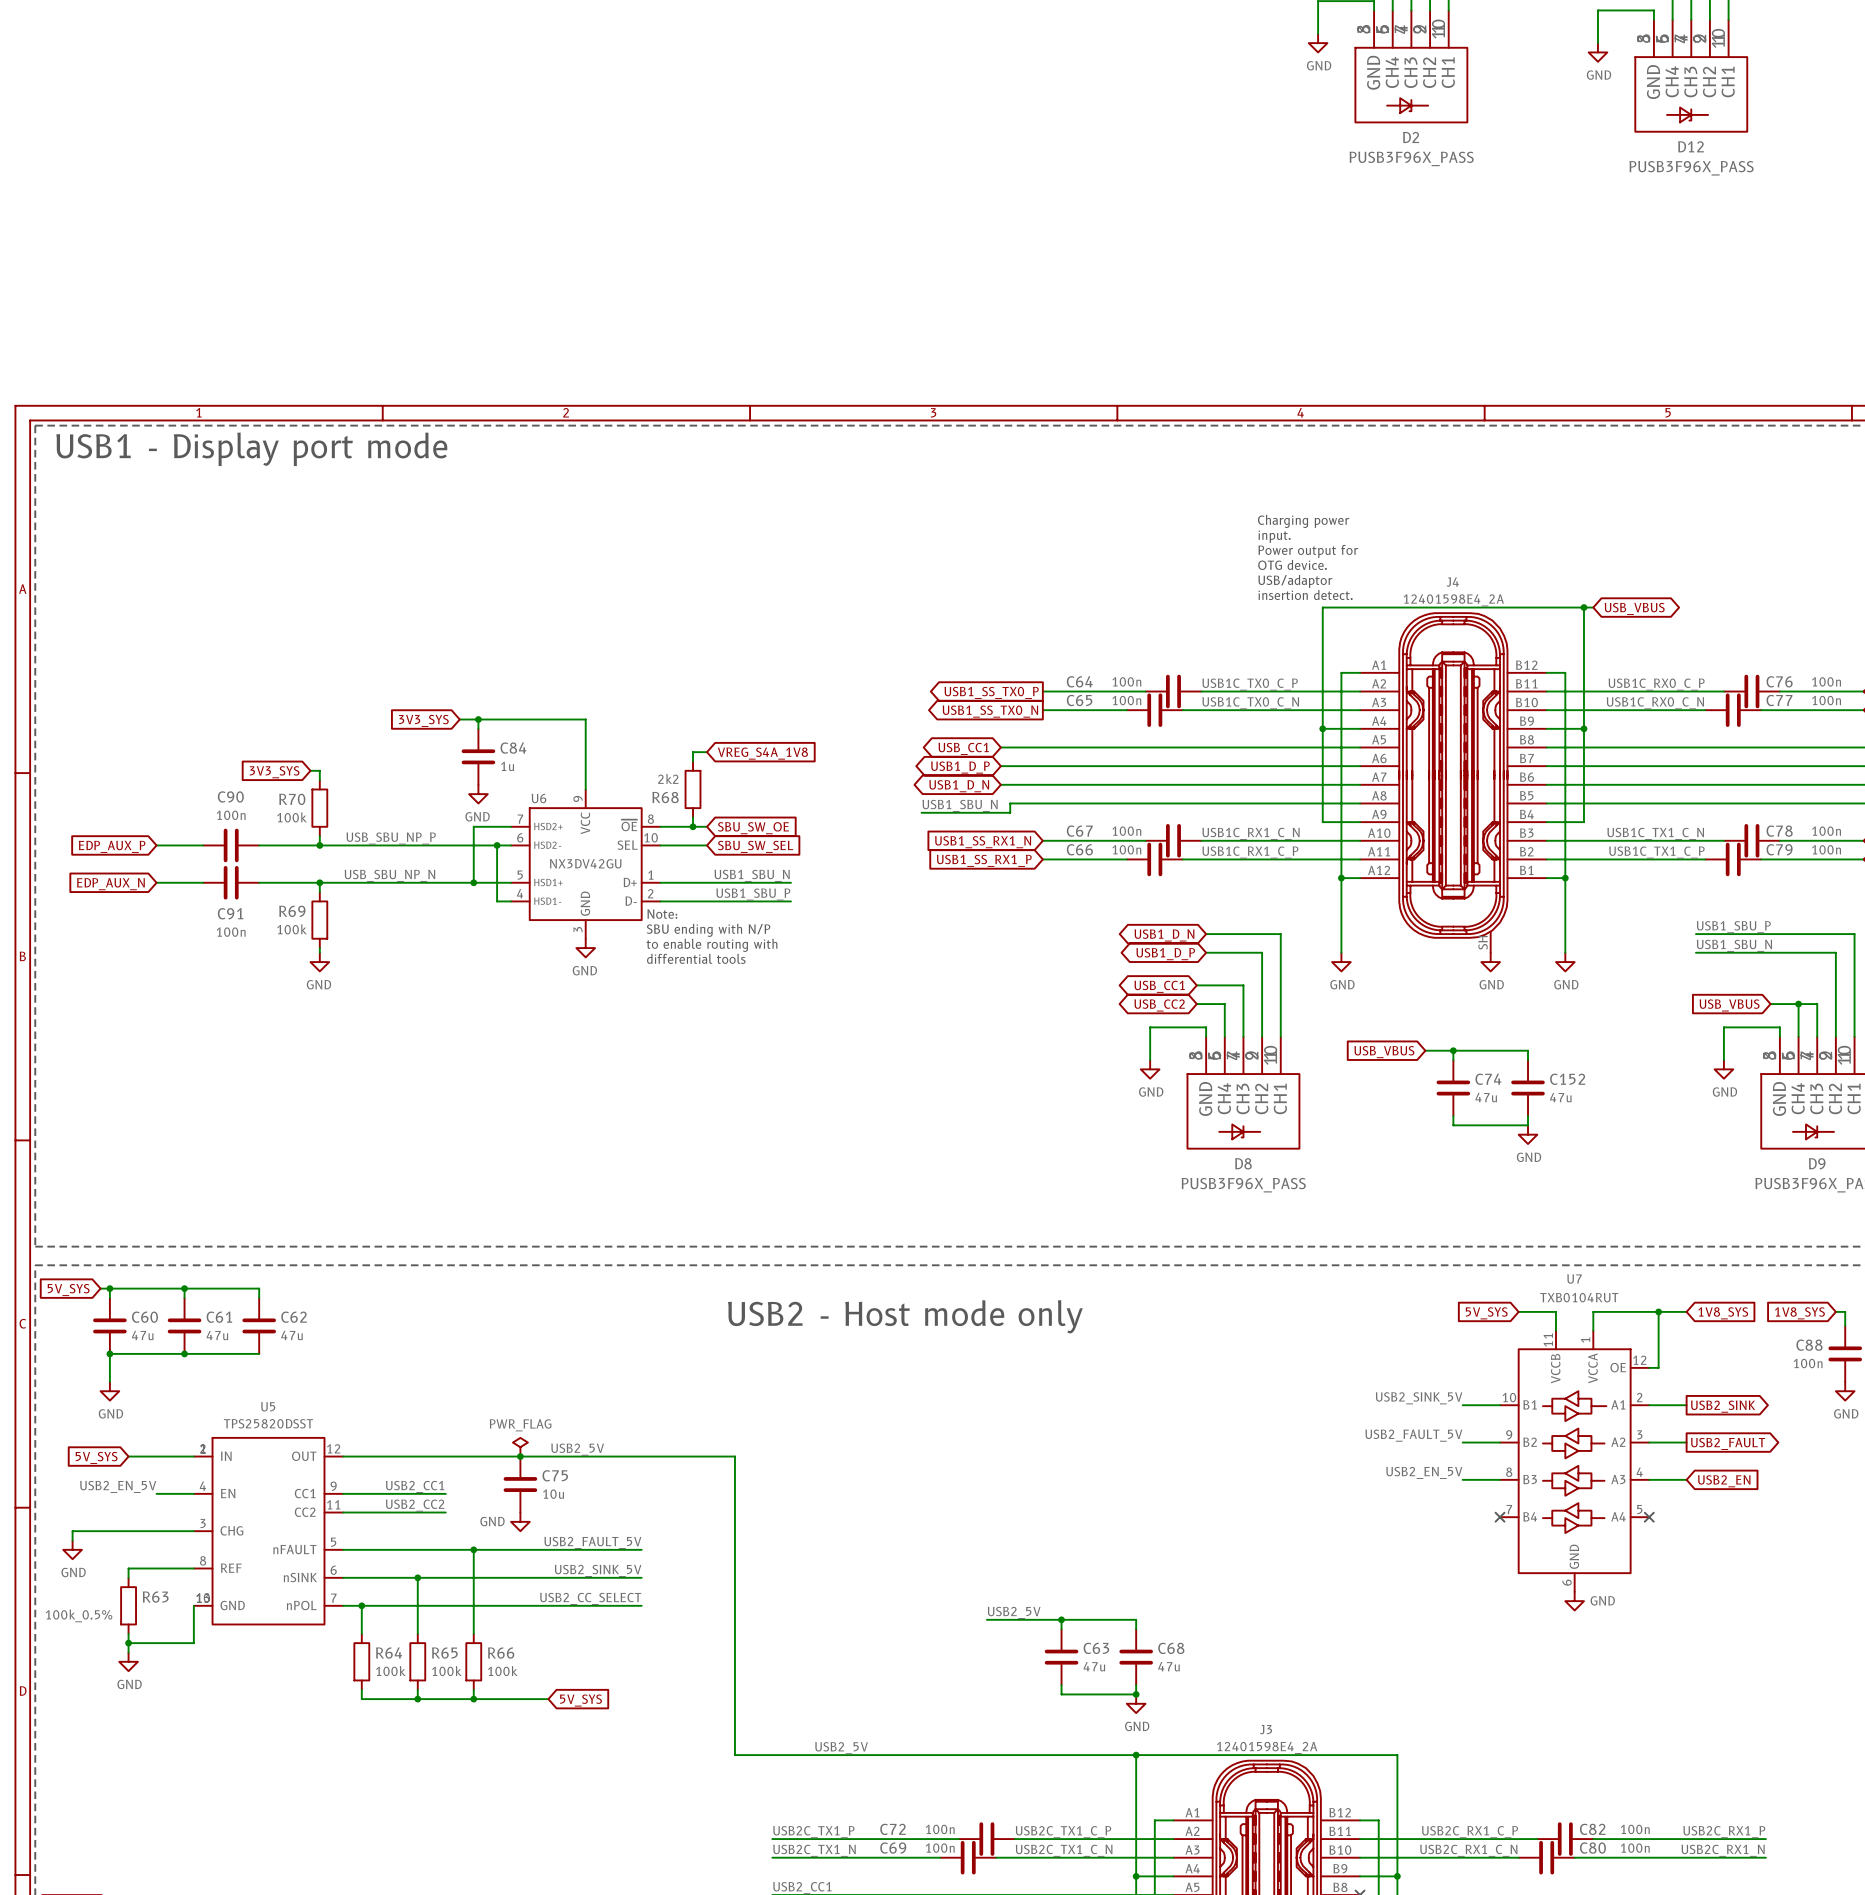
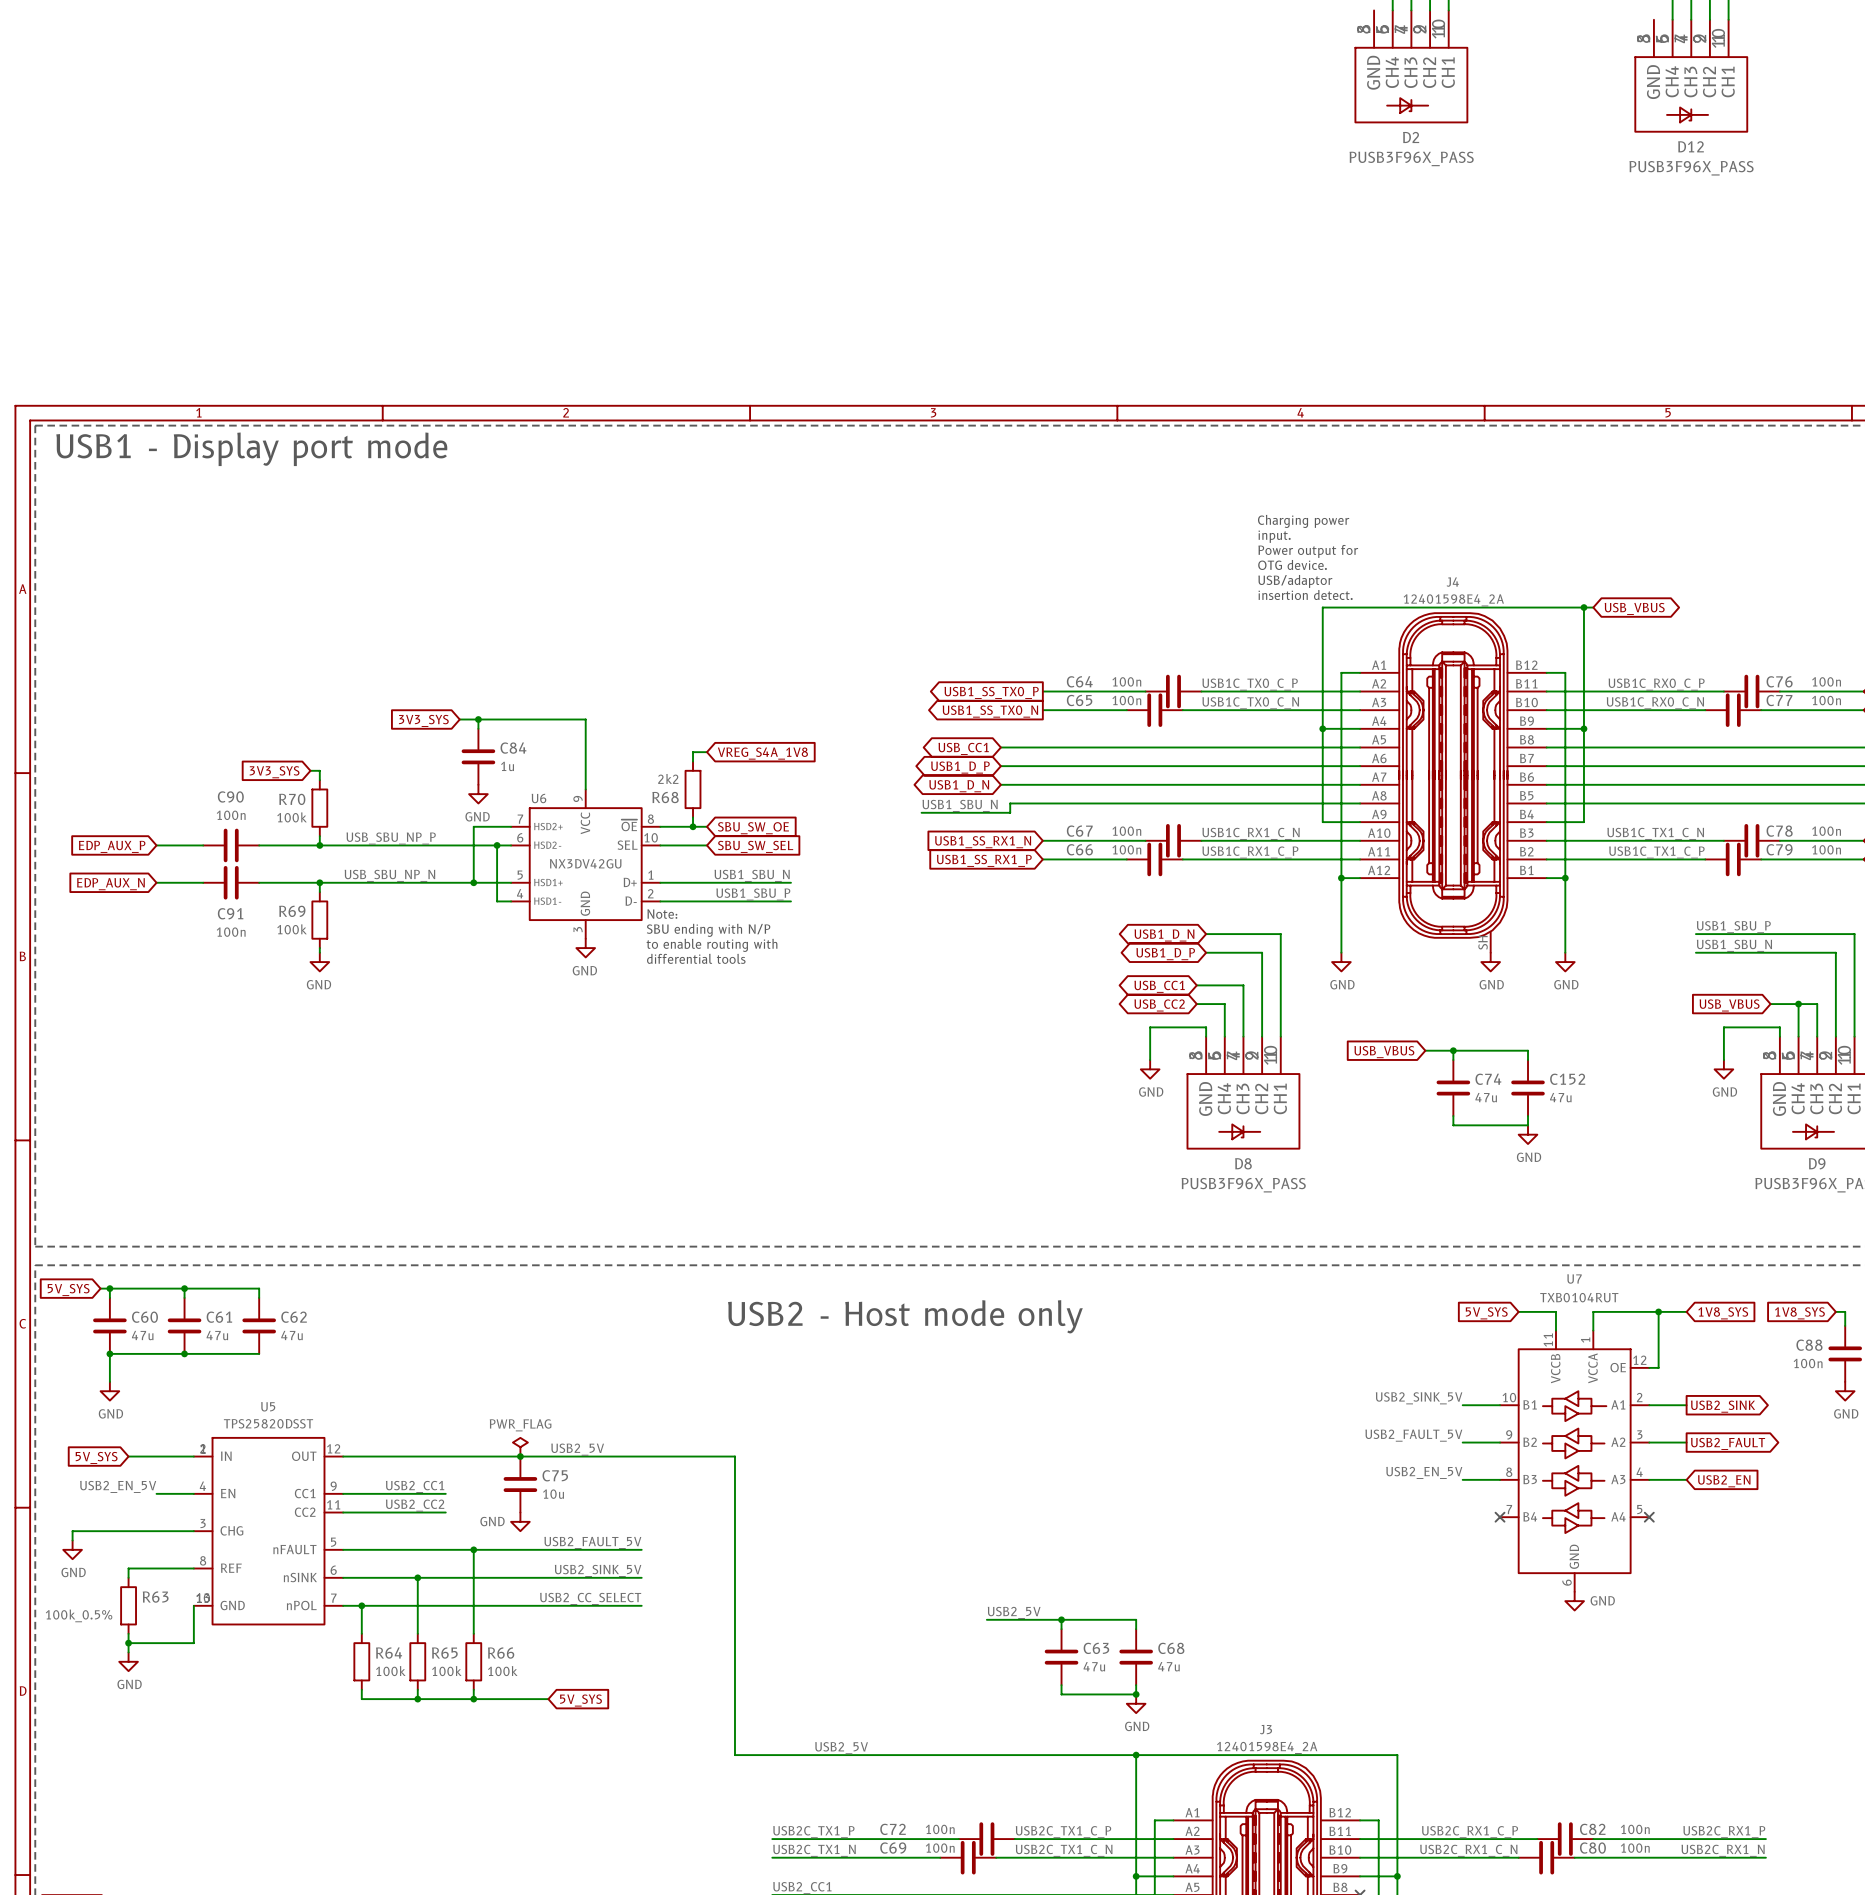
wire: (1374, 10) (1374, 1) (1318, 1) (1318, 33) -> none
wire: (1653, 19) (1653, 10) (1597, 10) (1597, 43) -> none
power symbol: GND (1318, 43) -> none
power symbol: GND (1597, 52) -> none

